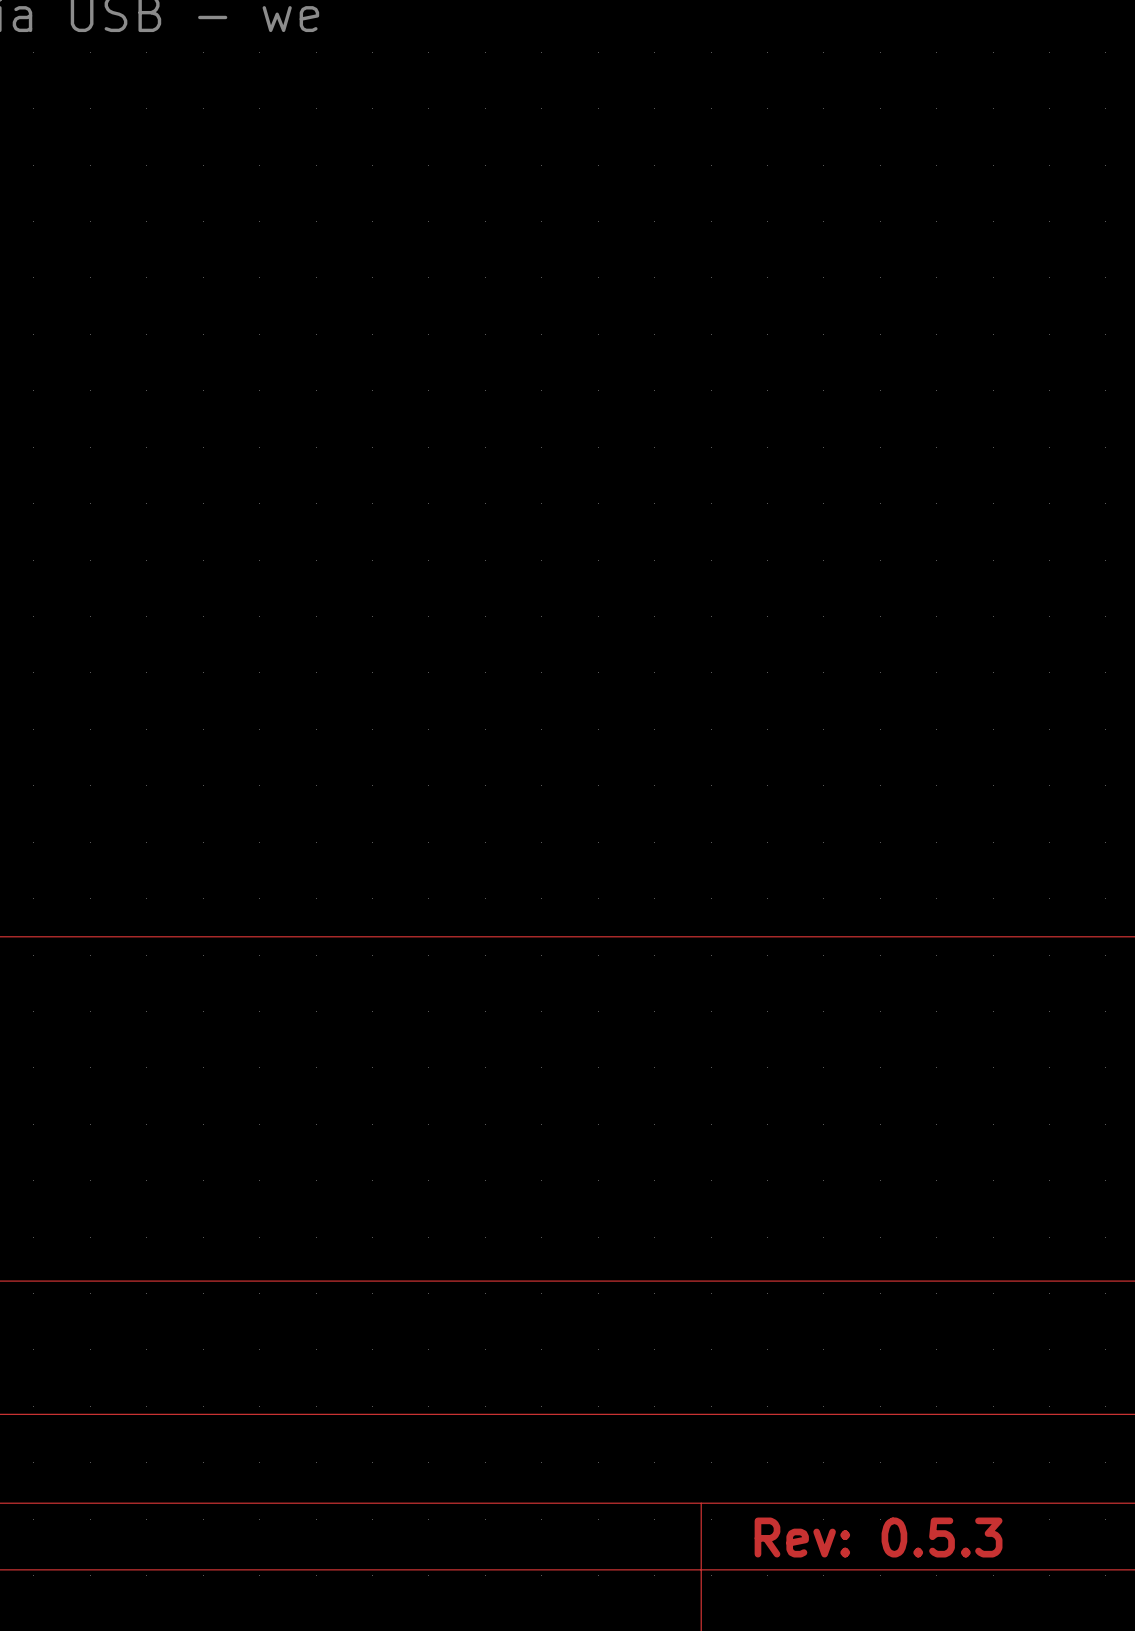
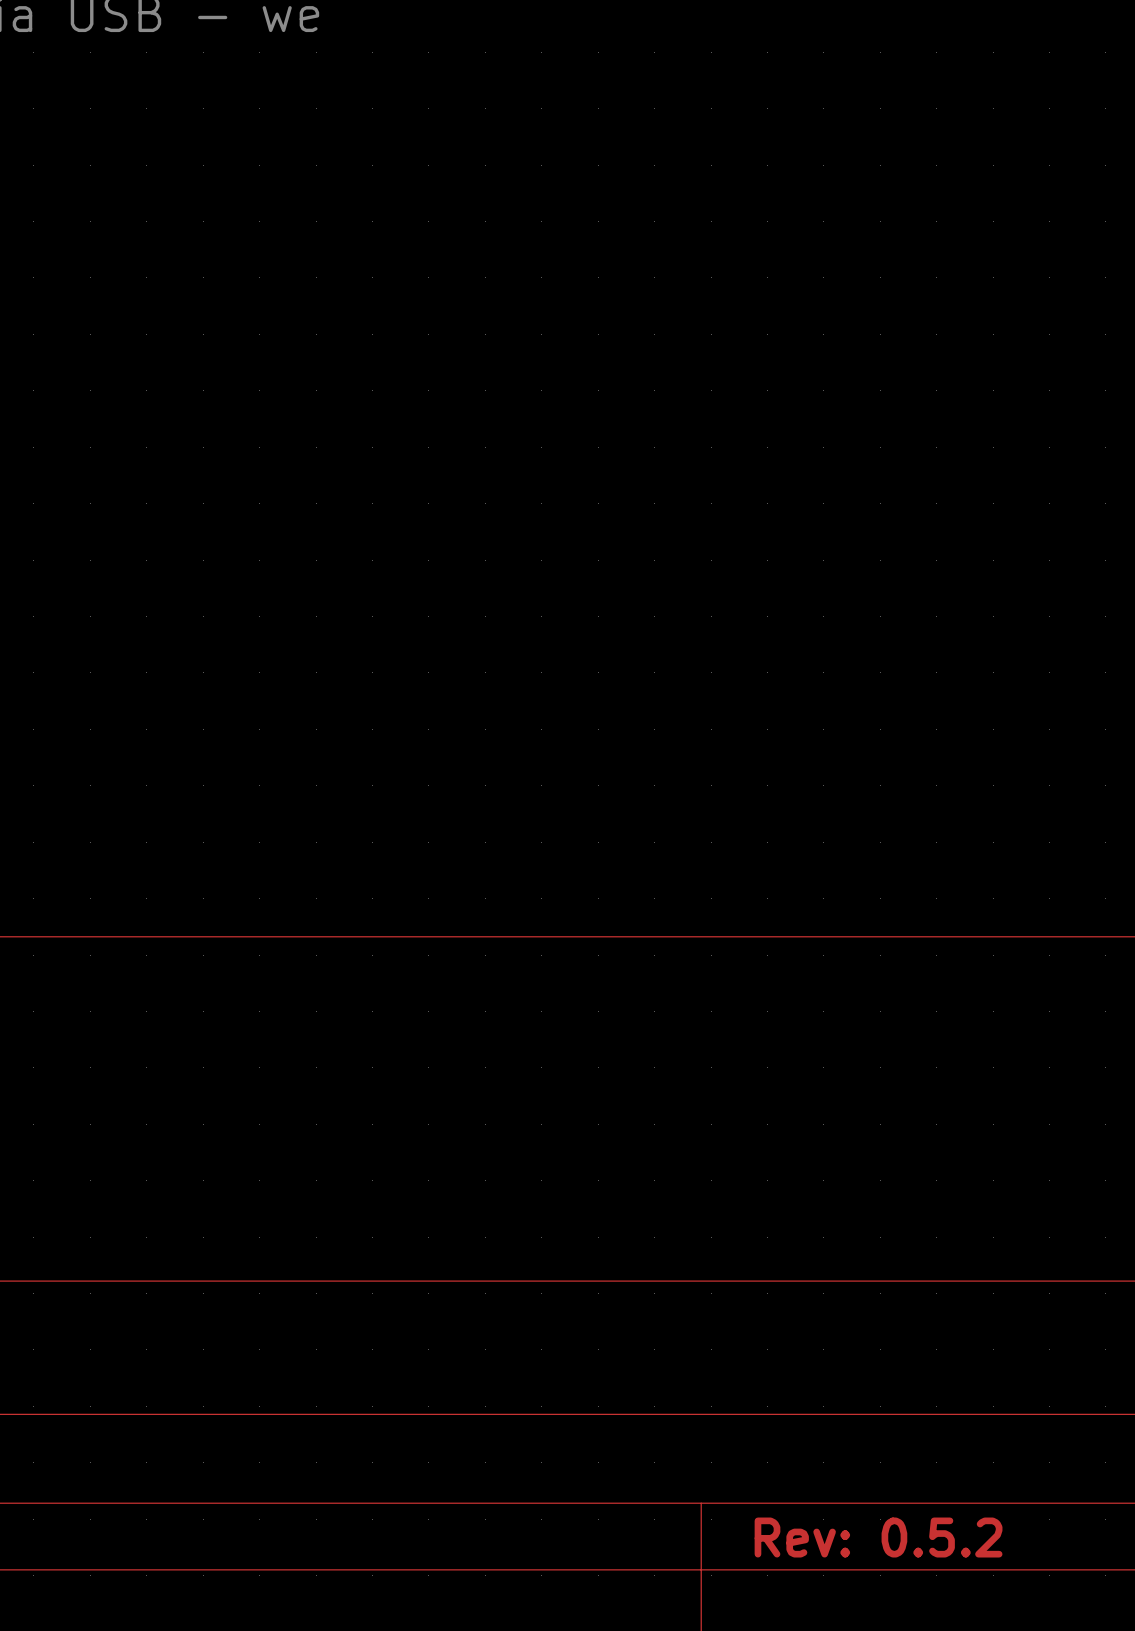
title block: Rev: 0.5.3 (878, 1537) -> Rev: 0.5.2 (878, 1537)

